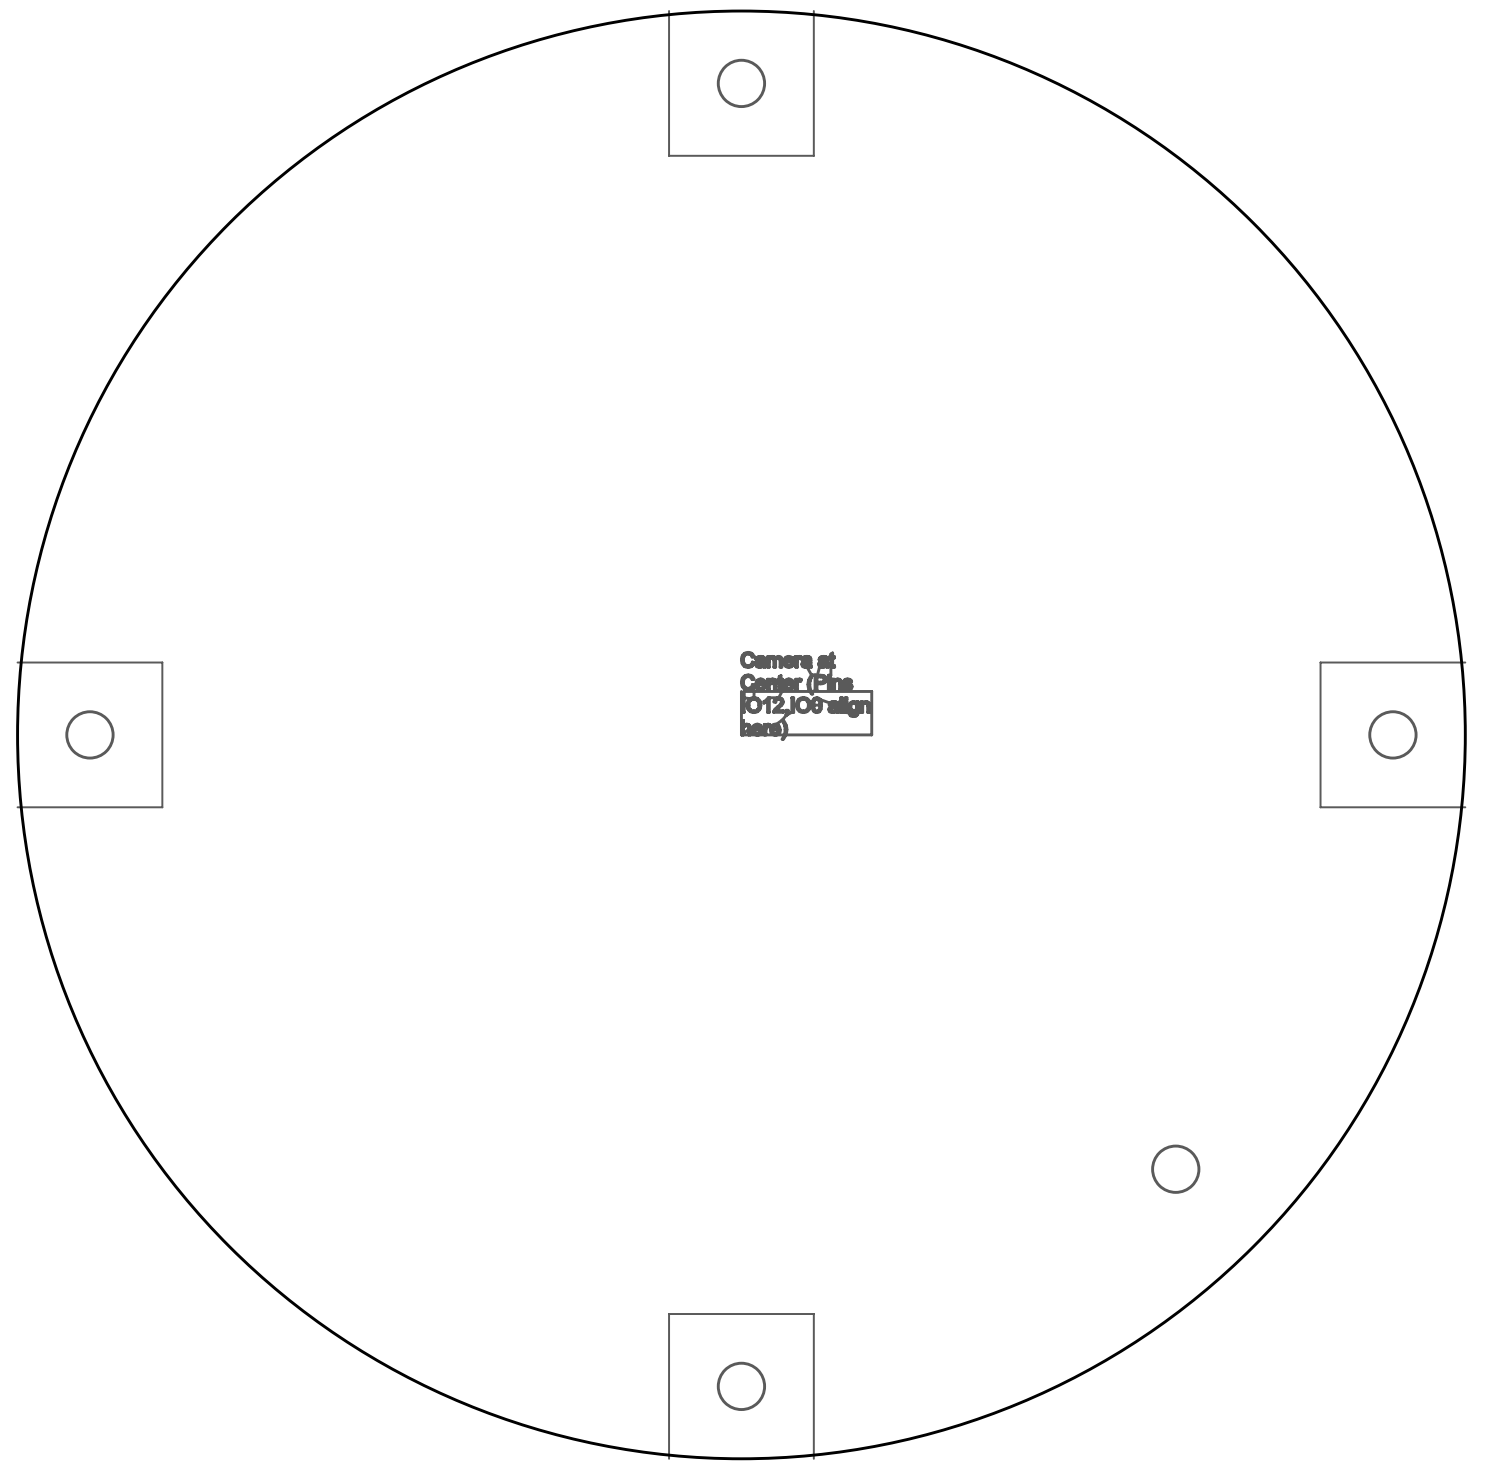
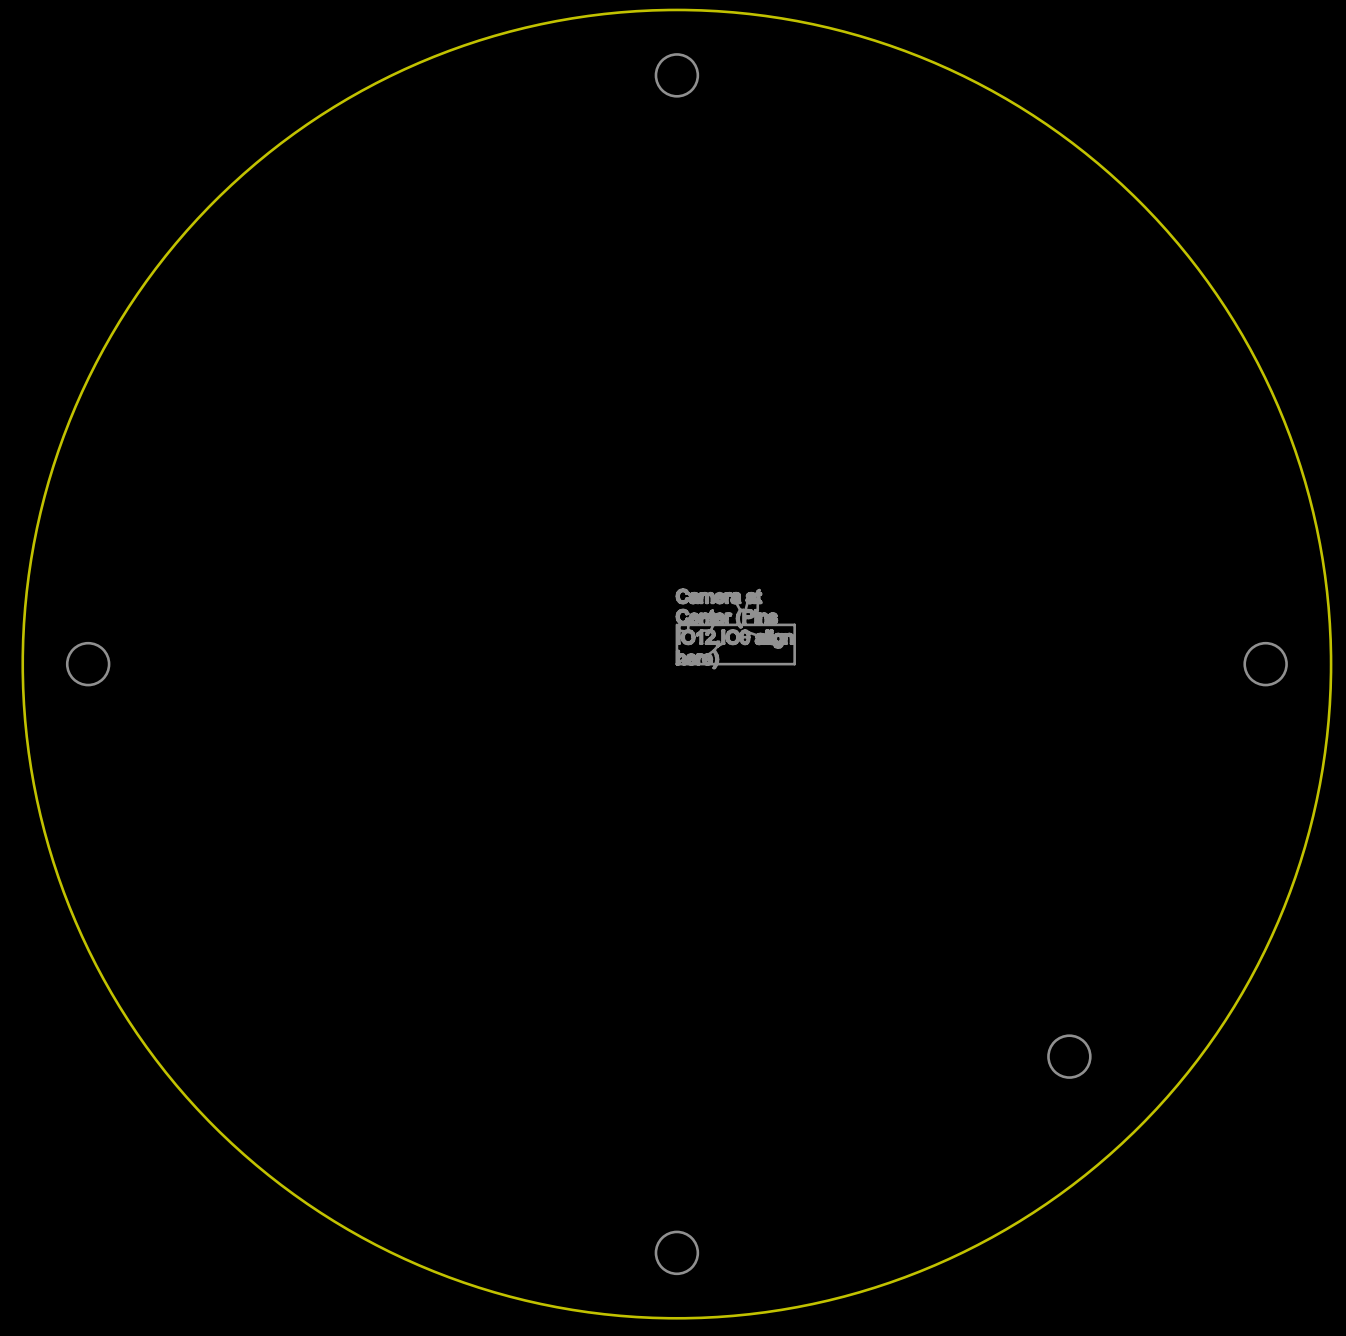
line: (669, 11) (669, 155) (813, 155) (813, 11) -> none
line: (17, 662) (162, 662) (162, 807) (17, 807) -> none
line: (1465, 662) (1320, 662) (1320, 807) (1465, 807) -> none
line: (669, 1458) (669, 1314) (813, 1314) (813, 1458) -> none

